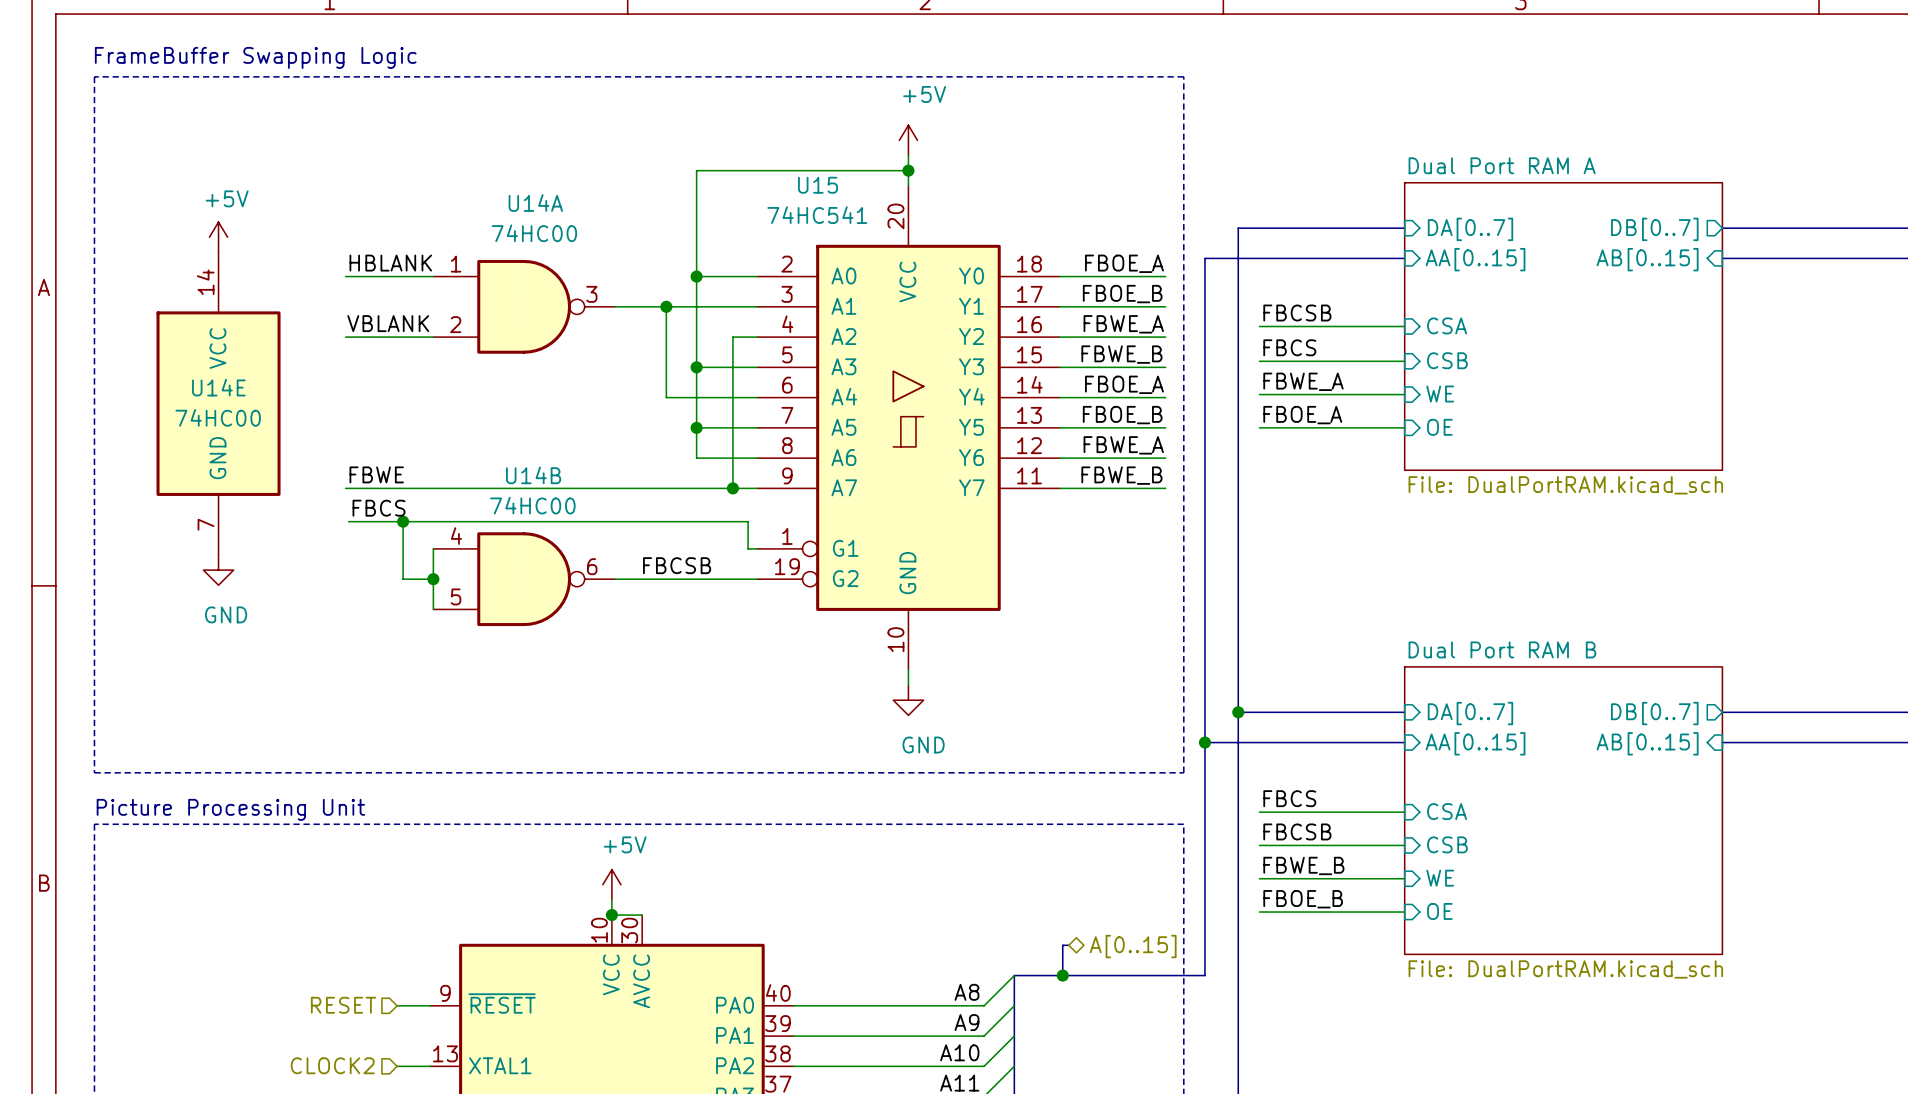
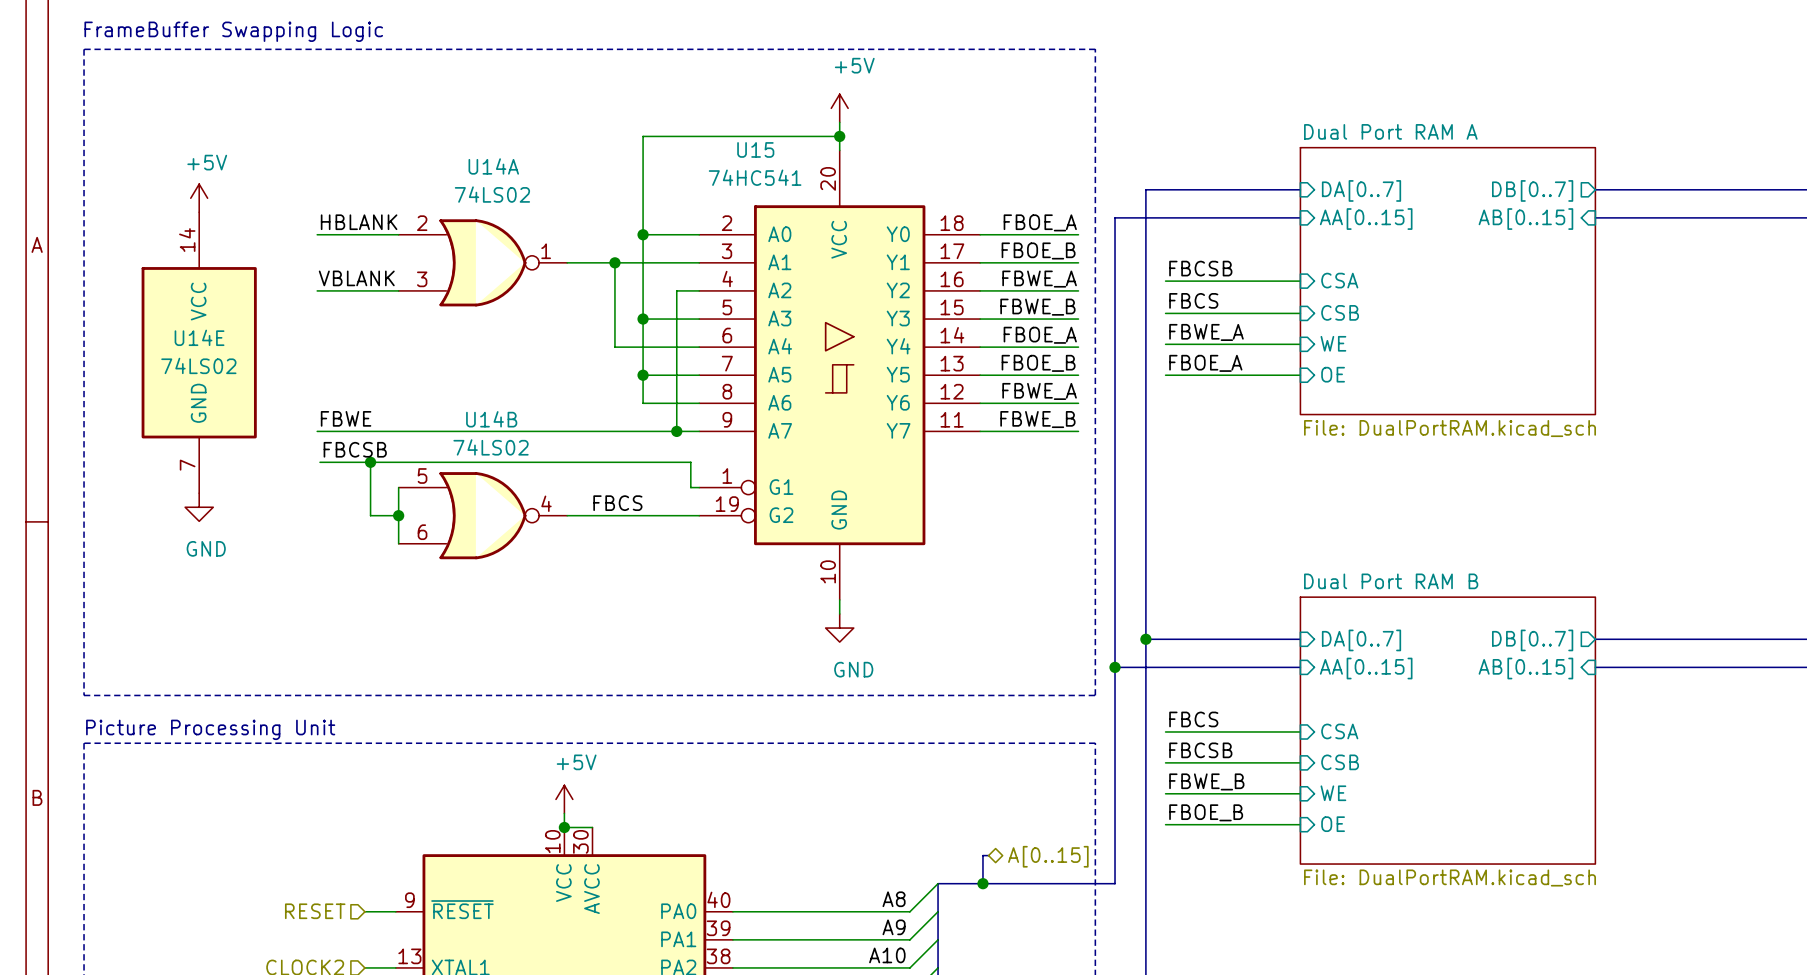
U14A value: 74HC00 (534, 233) -> 74LS02 (492, 194)
U14A symbol: [433, 259, 615, 354] -> [398, 219, 568, 307]
U14E value: 74HC00 (218, 417) -> 74LS02 (198, 365)
U14B value: 74HC00 (532, 505) -> 74LS02 (491, 447)
label: FBCS (379, 508) -> FBCSB (355, 449)
U14B symbol: [433, 532, 615, 627] -> [398, 472, 568, 560]
label: FBCSB (677, 565) -> FBCS (617, 503)

